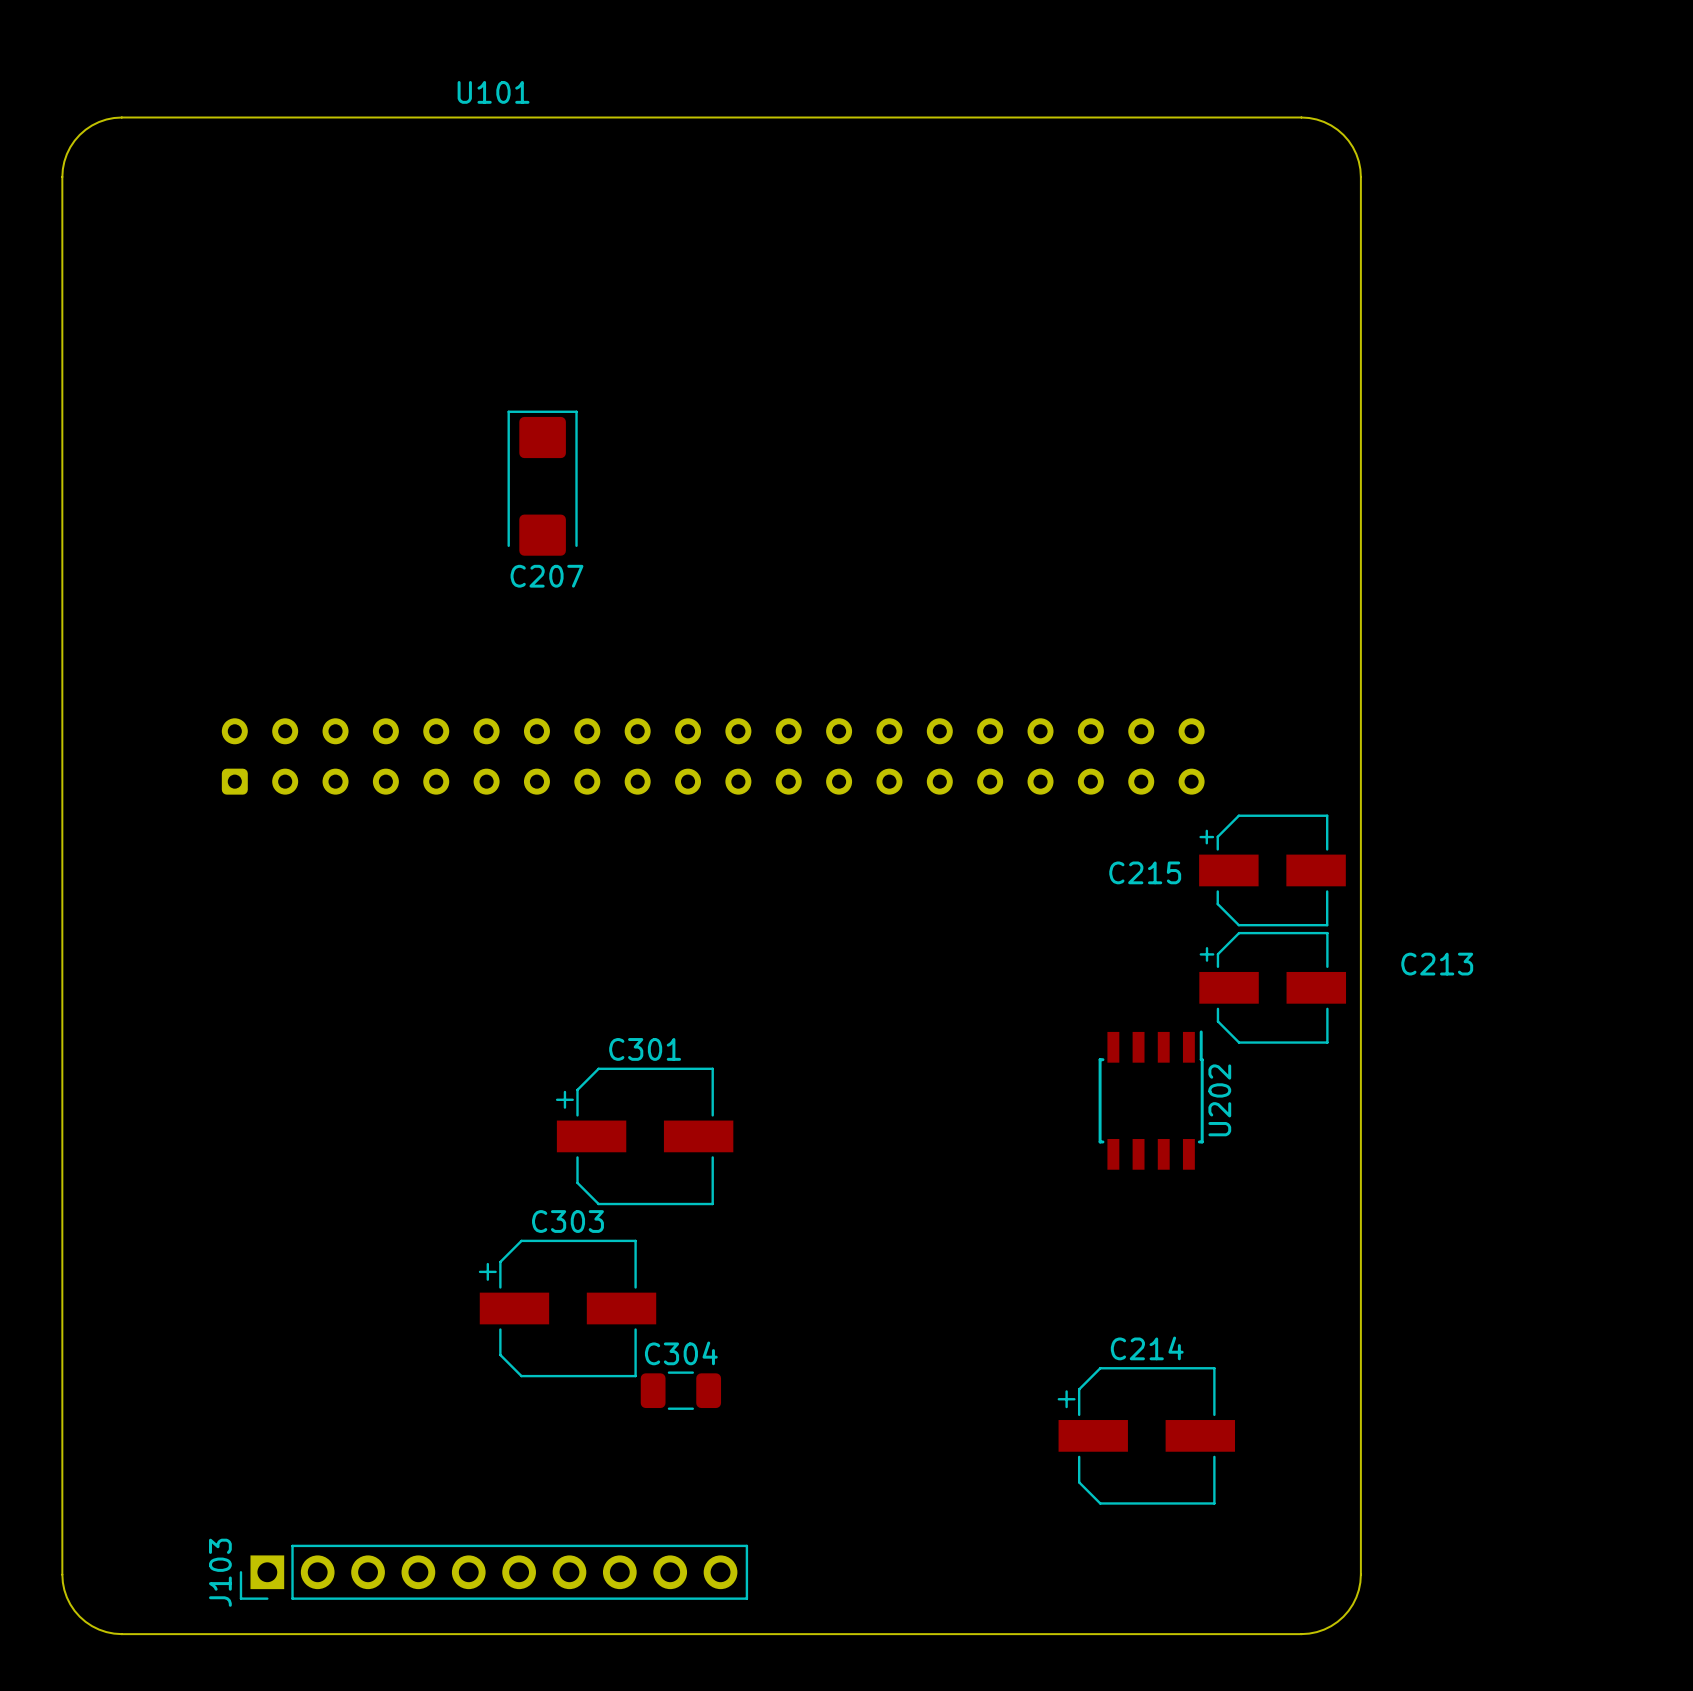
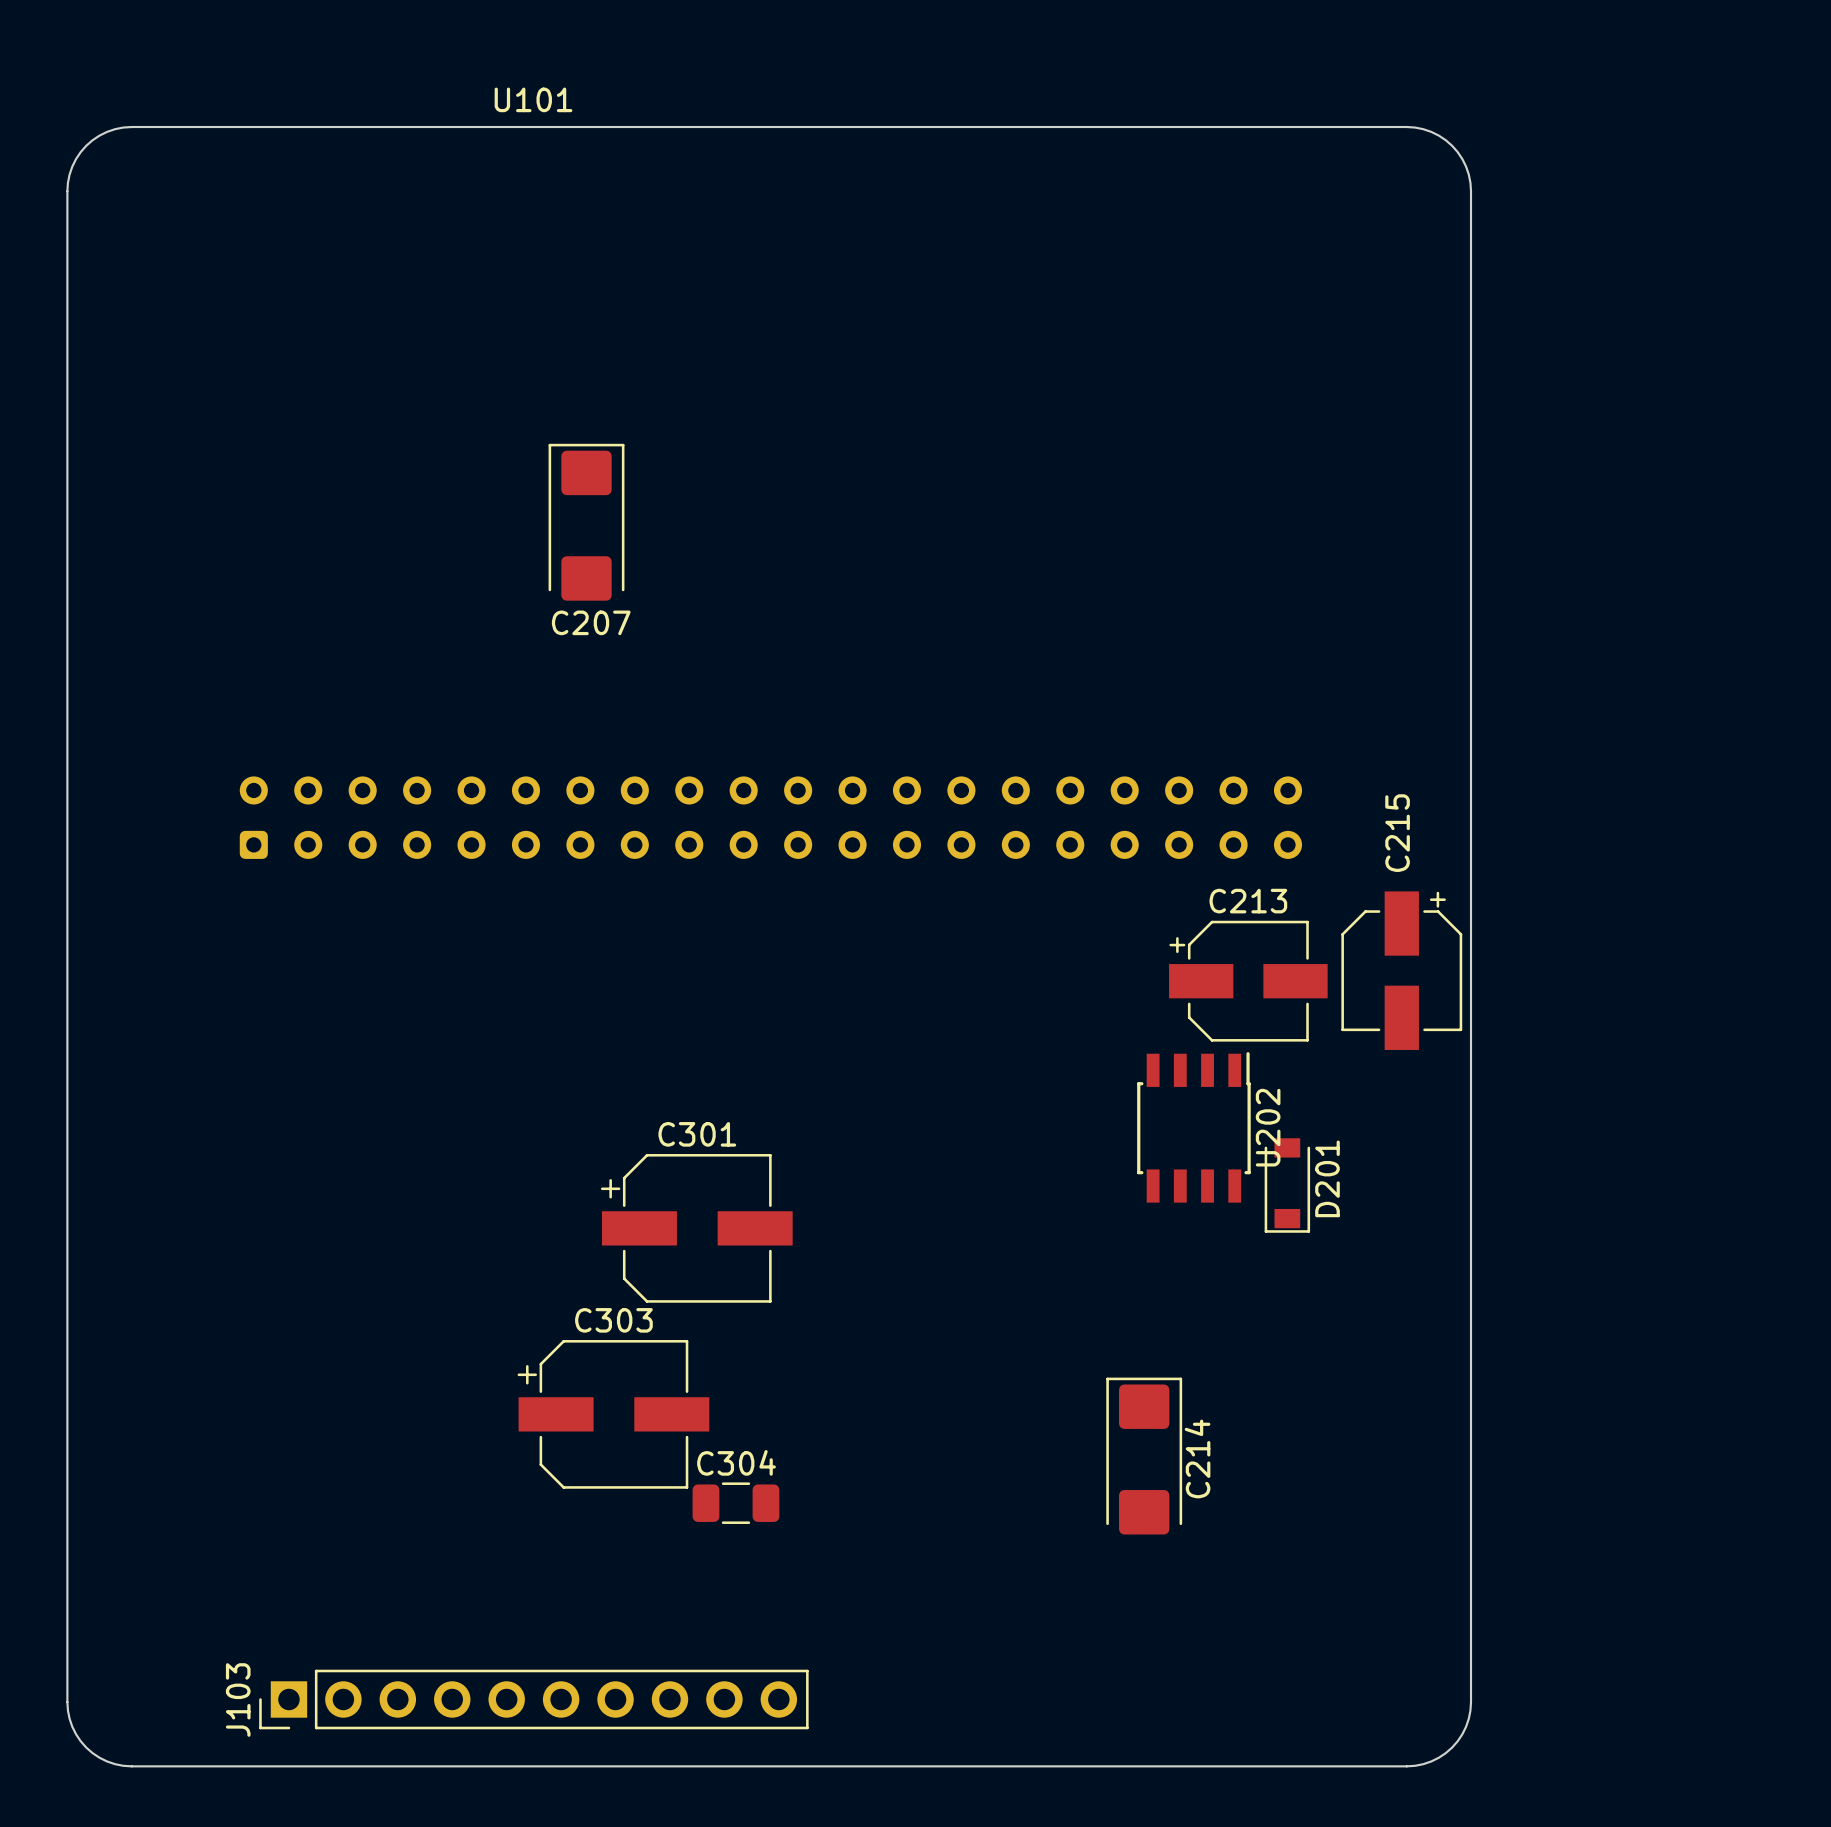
C215 rotation: 0° (1272, 870) -> 90° clockwise (1401, 970)
C213 name position: C213 (1437, 964) -> C213 (1248, 901)
C213 position: (1272, 987) -> (1248, 981)
D201: none -> (1287, 1185)
U202 position: (1151, 1100) -> (1193, 1127)
C214 name position: C214 (1147, 1348) -> C214 (1197, 1458)
C214 footprint: [1057, 1367, 1236, 1505] -> [1106, 1377, 1183, 1535]

